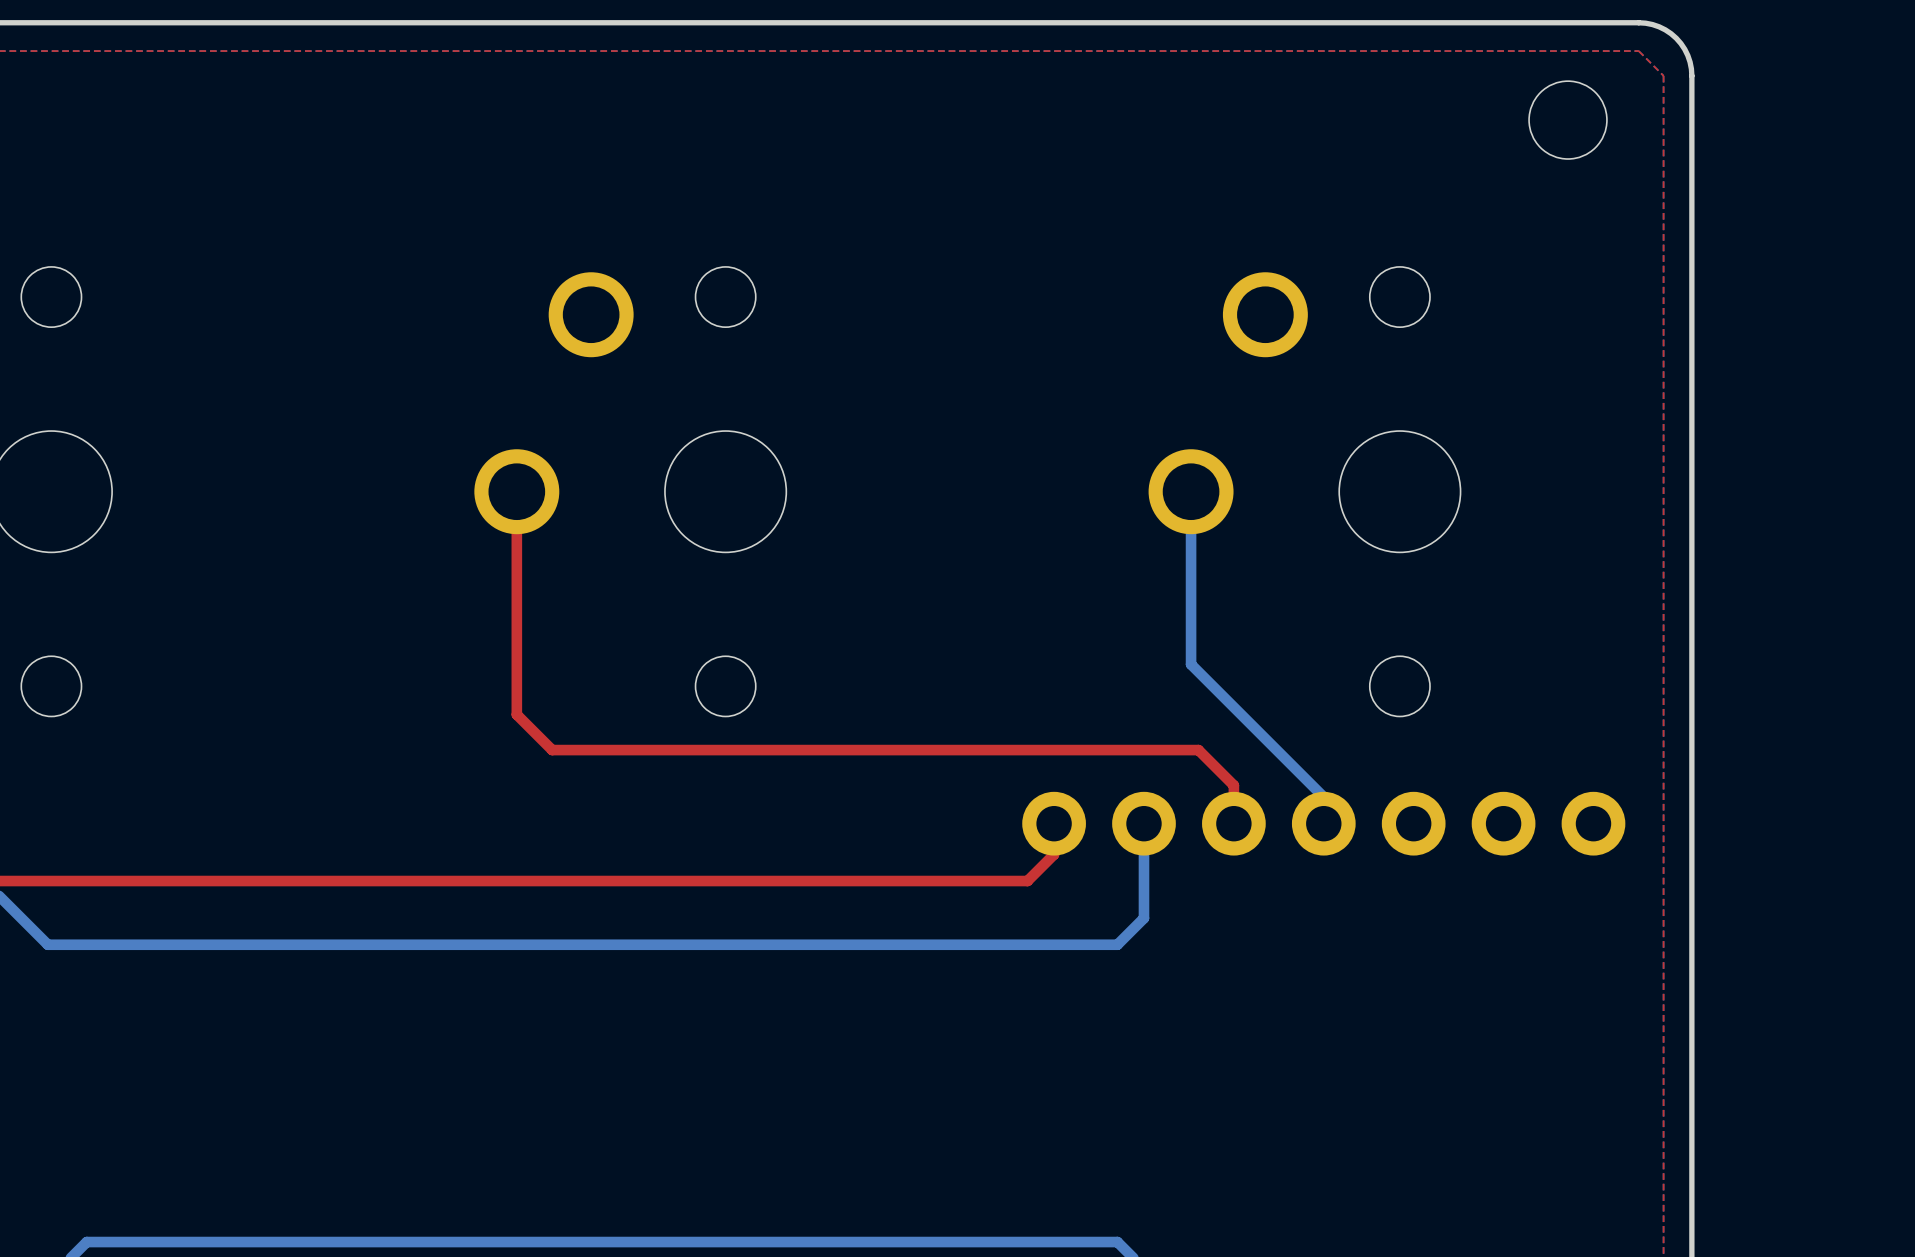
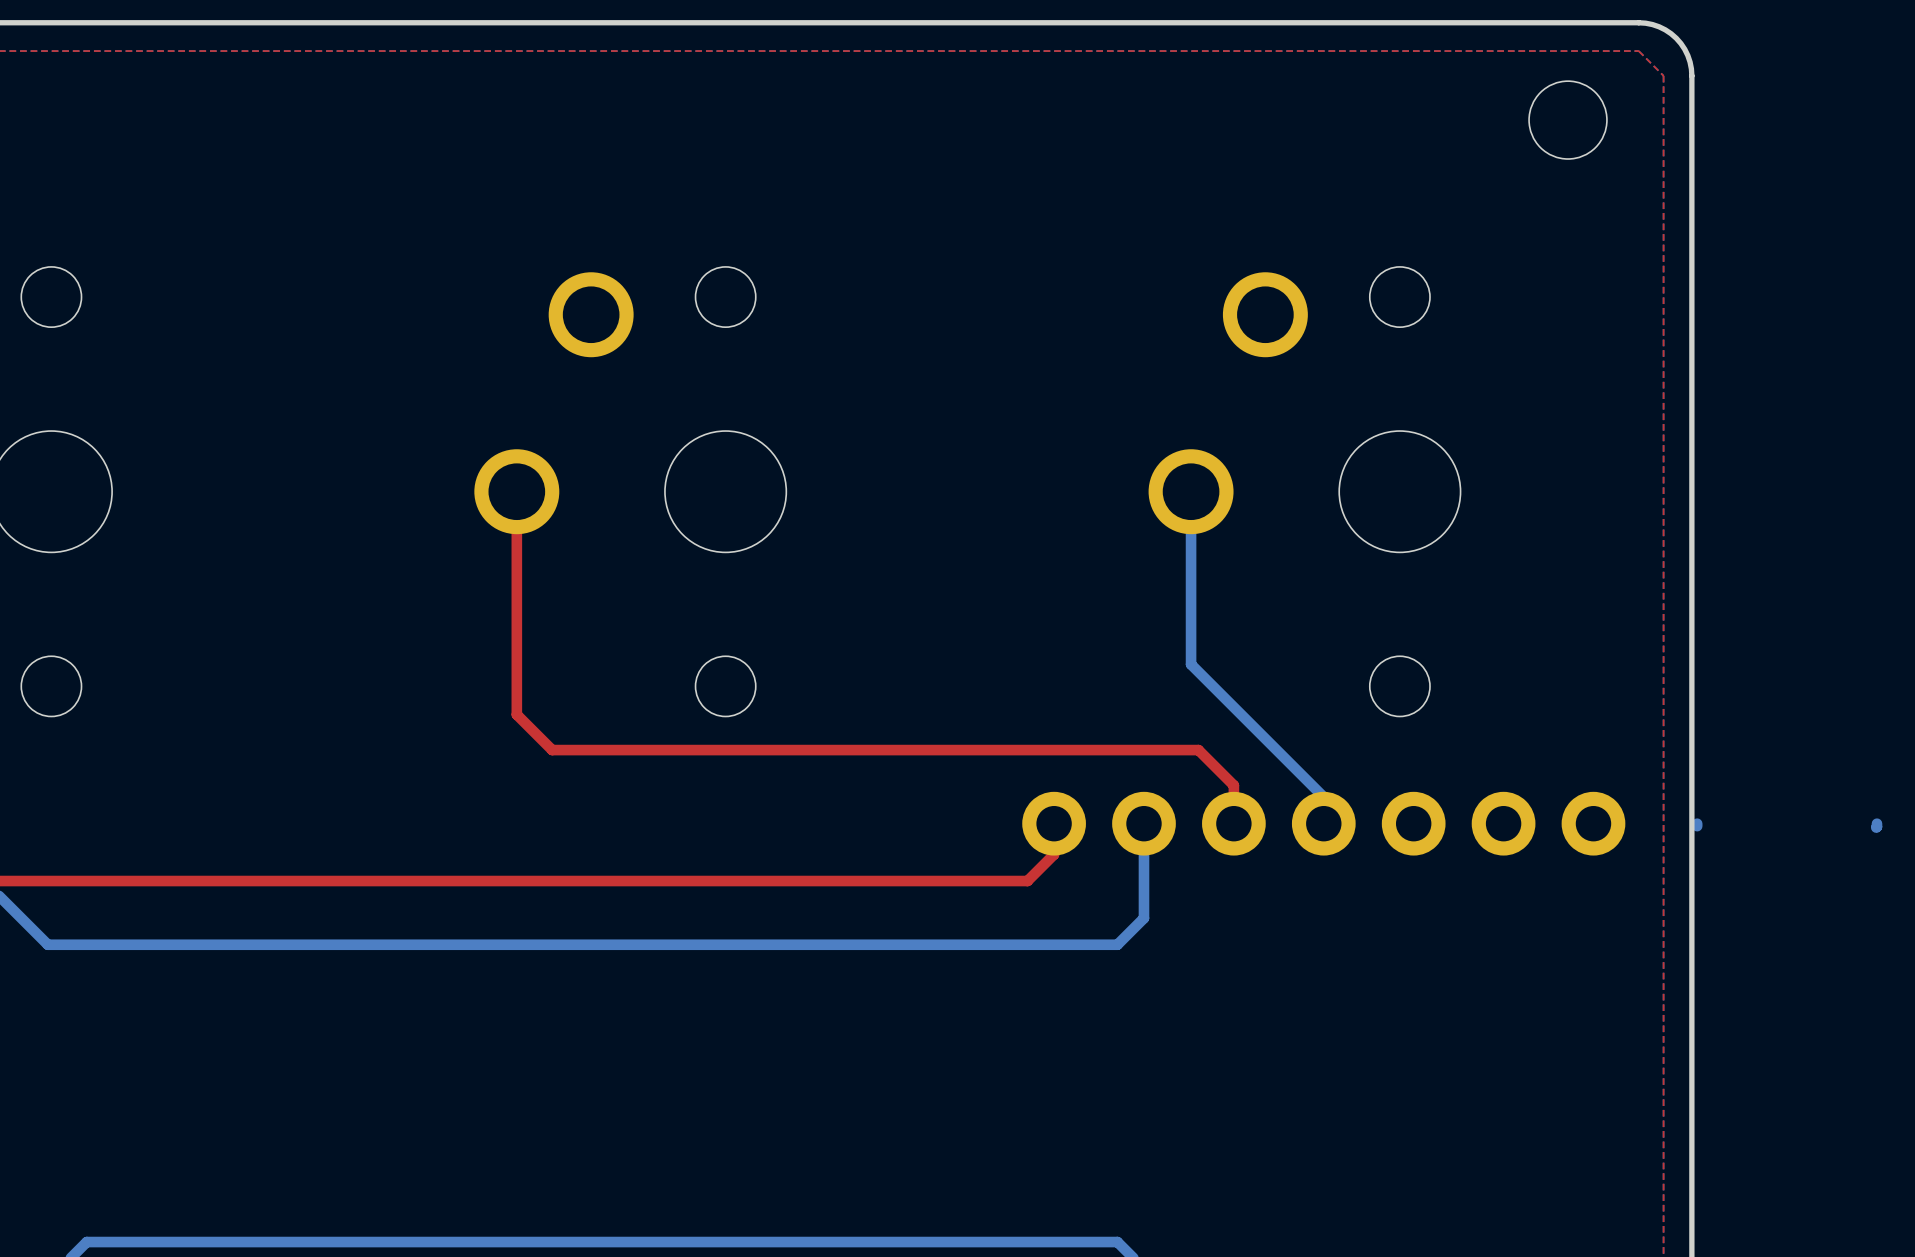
bottom track: none -> (1697, 823) (1697, 826)
bottom track: none -> (1876, 823) (1876, 827)

